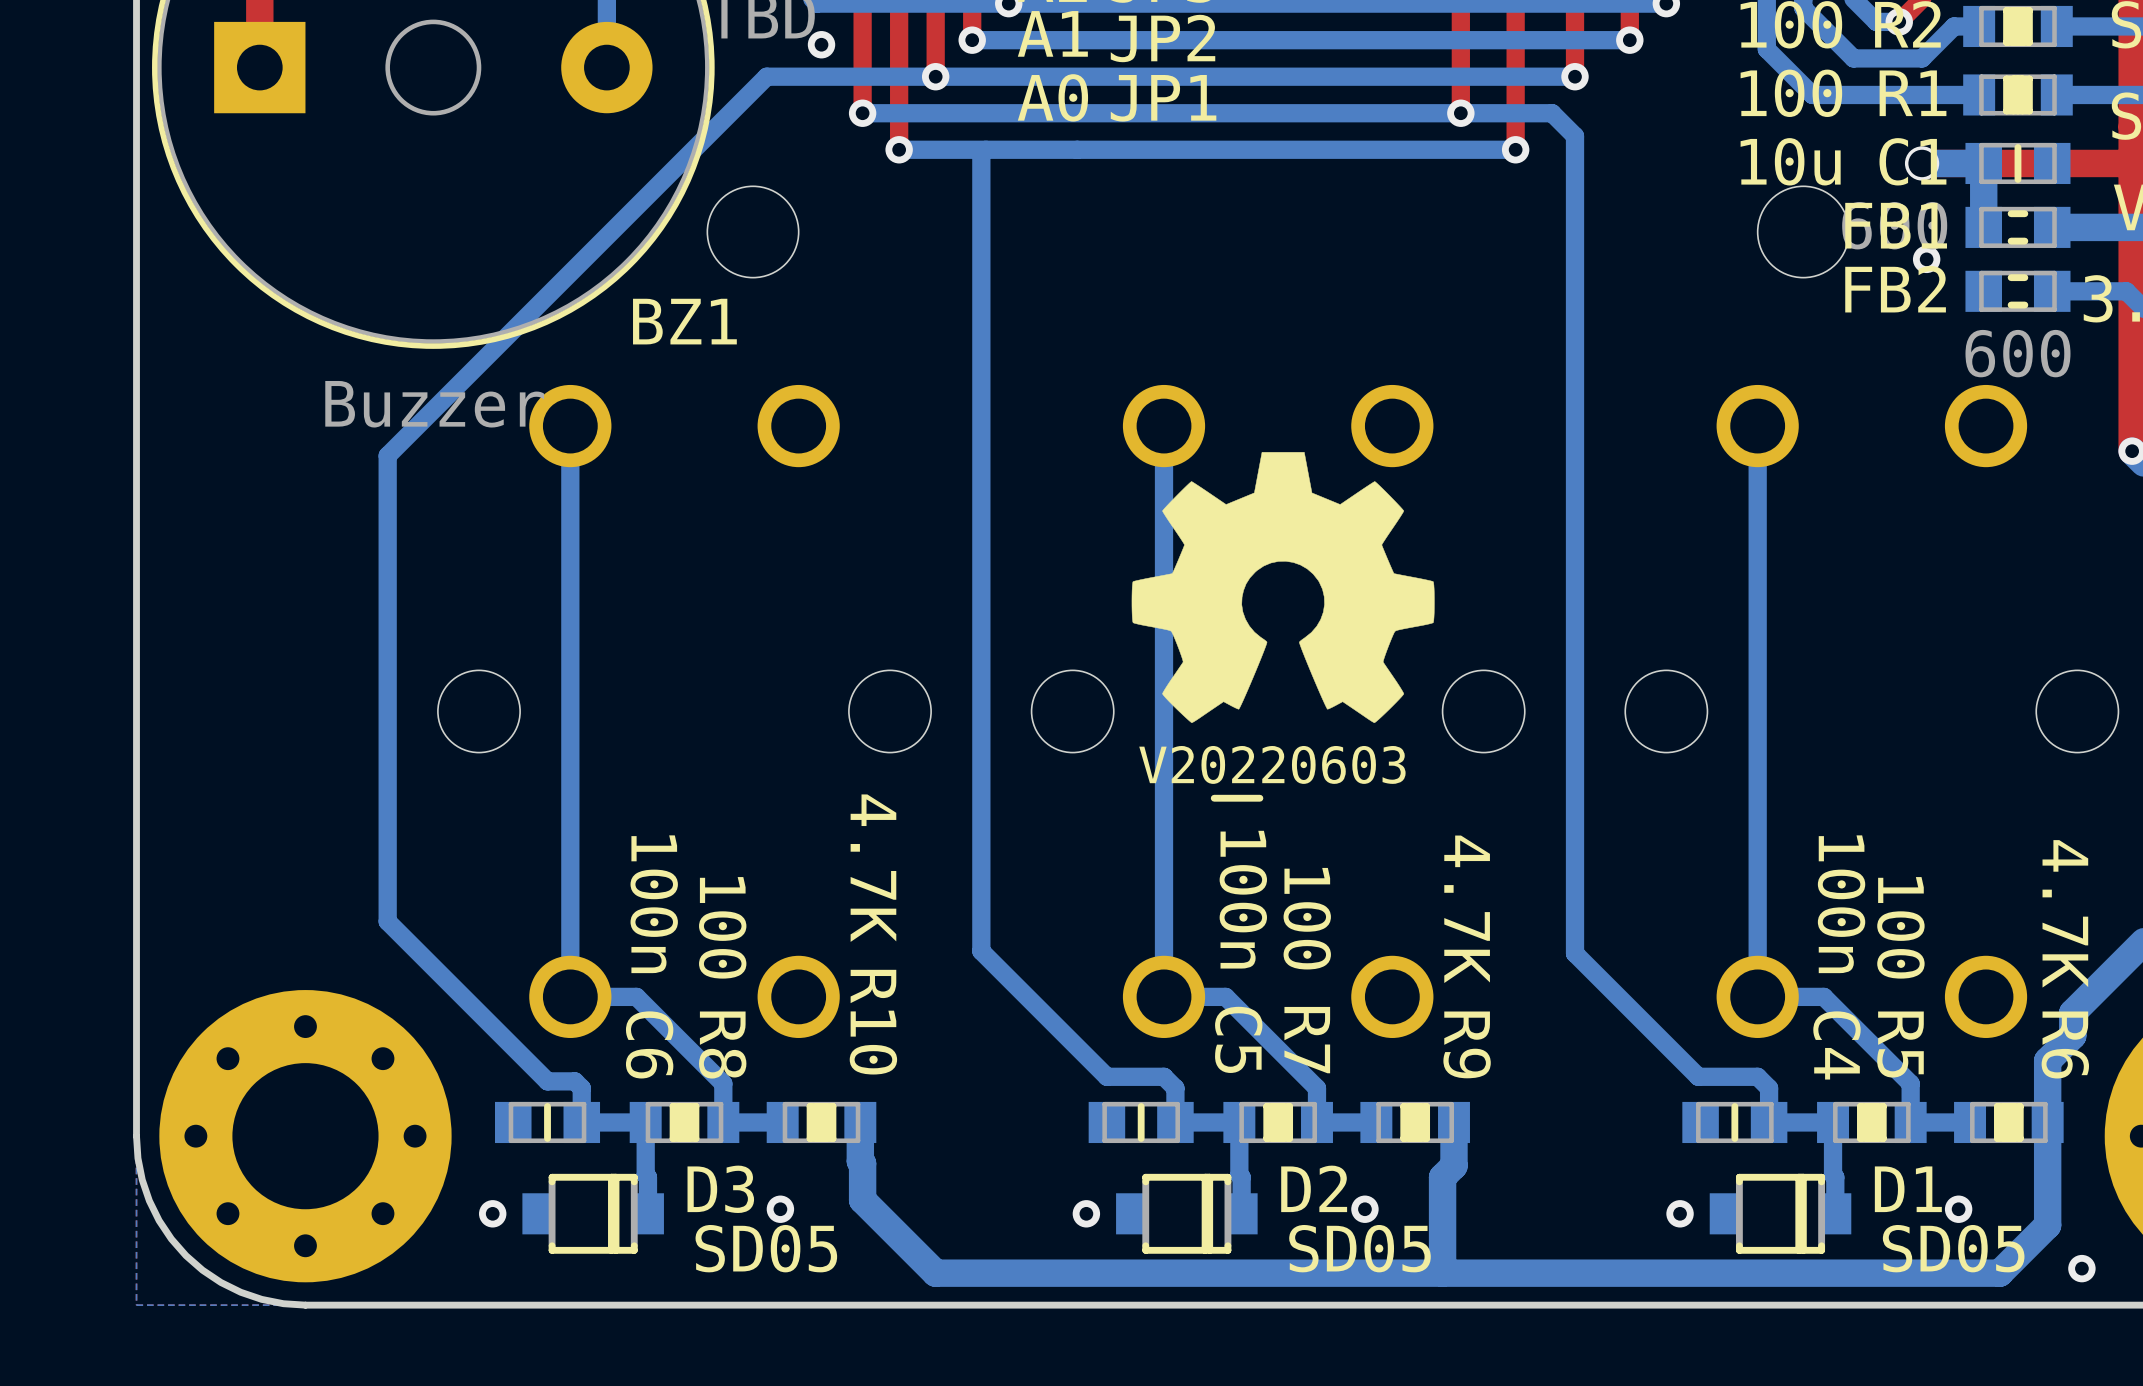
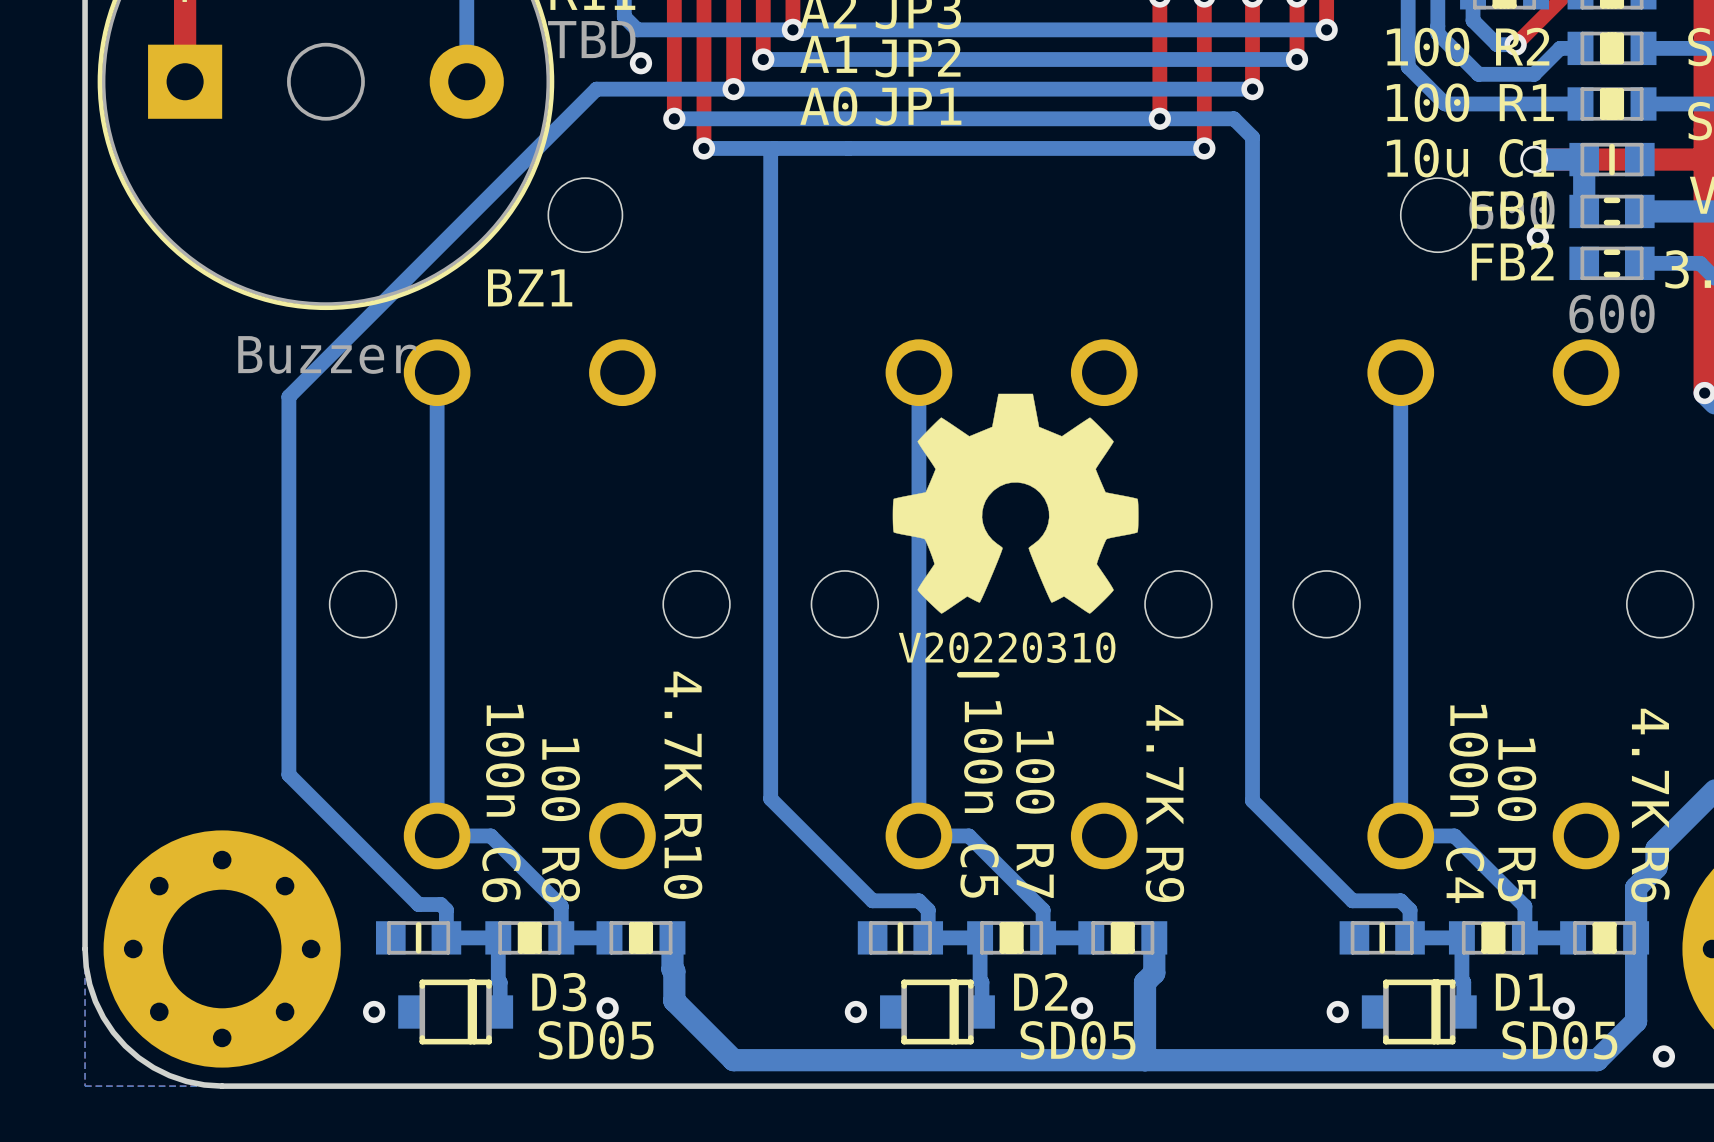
drawing shape: [1139, 745, 1406, 802] -> [898, 632, 1116, 678]

